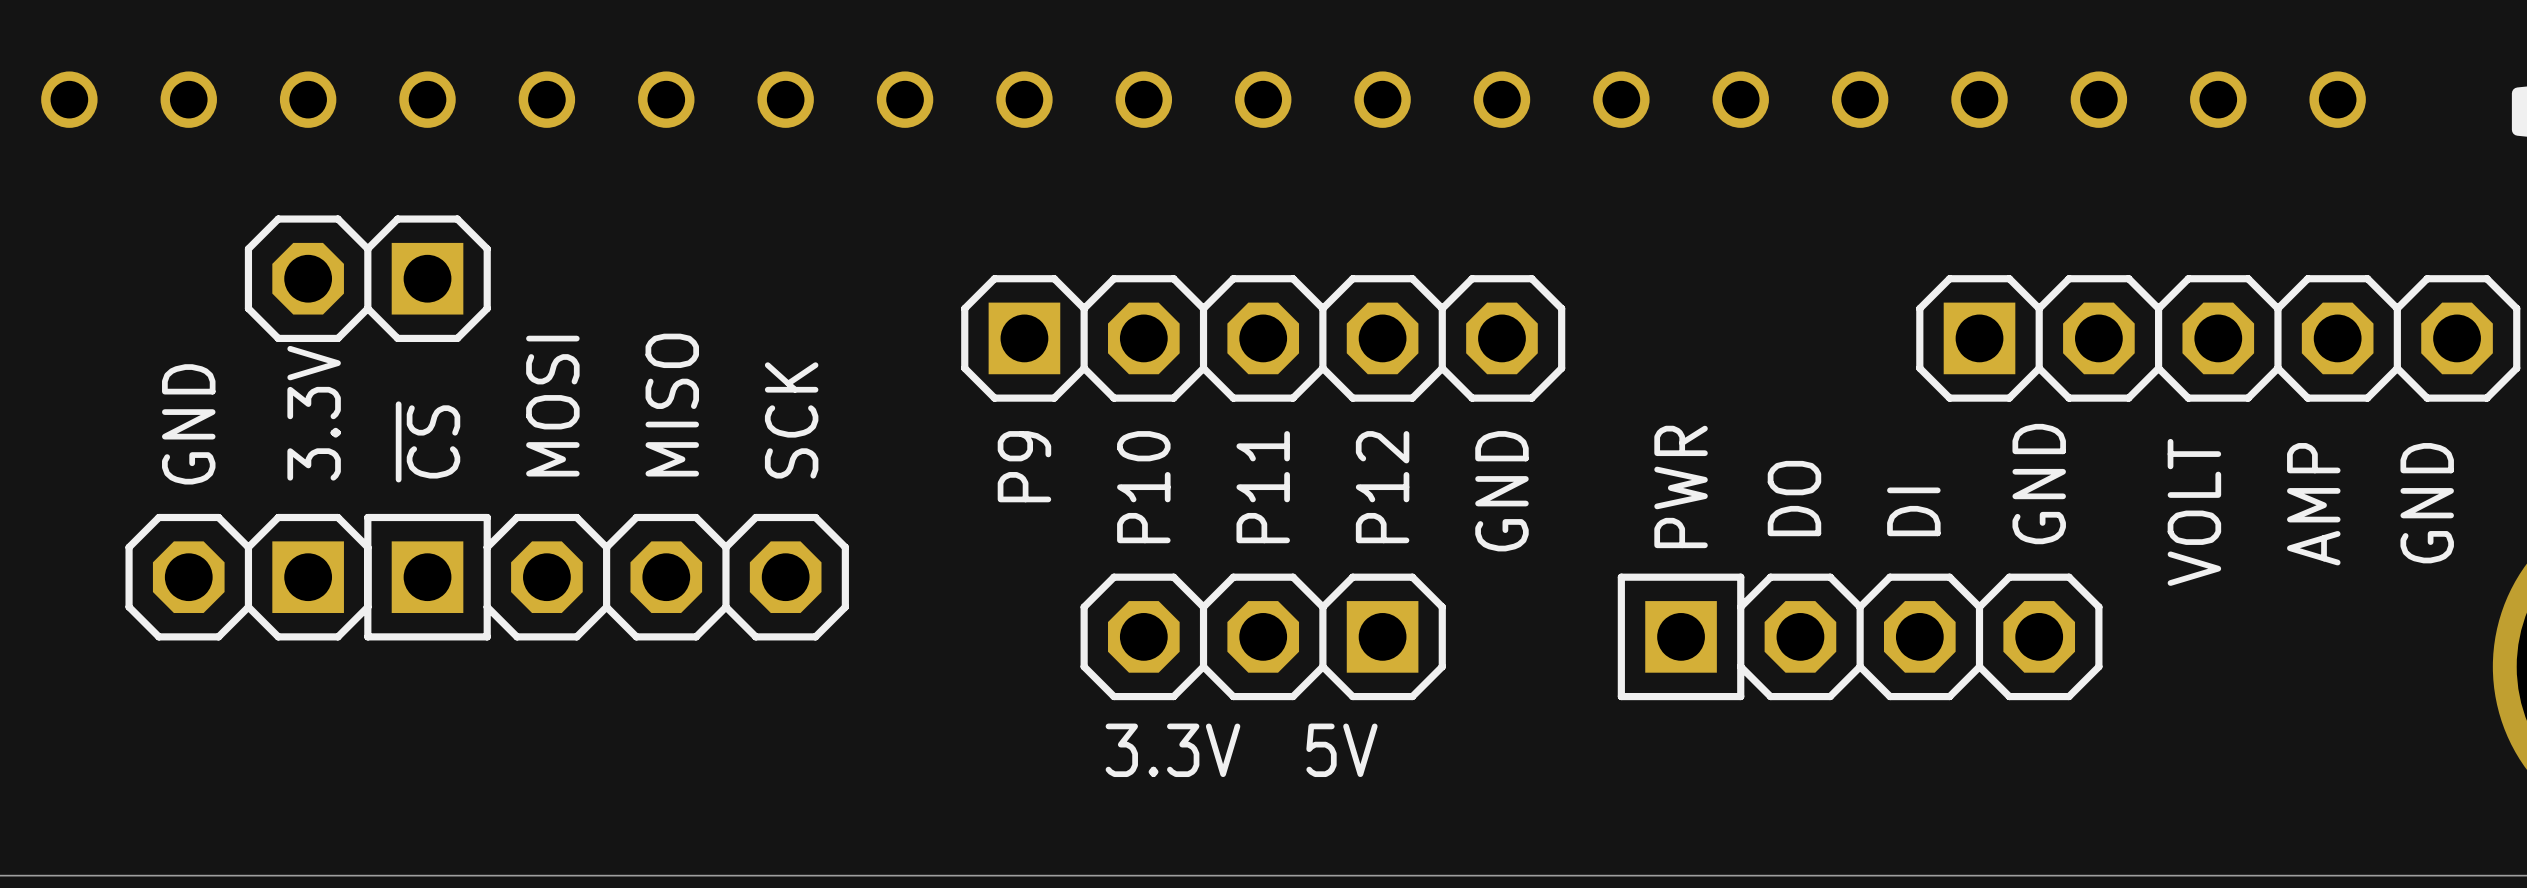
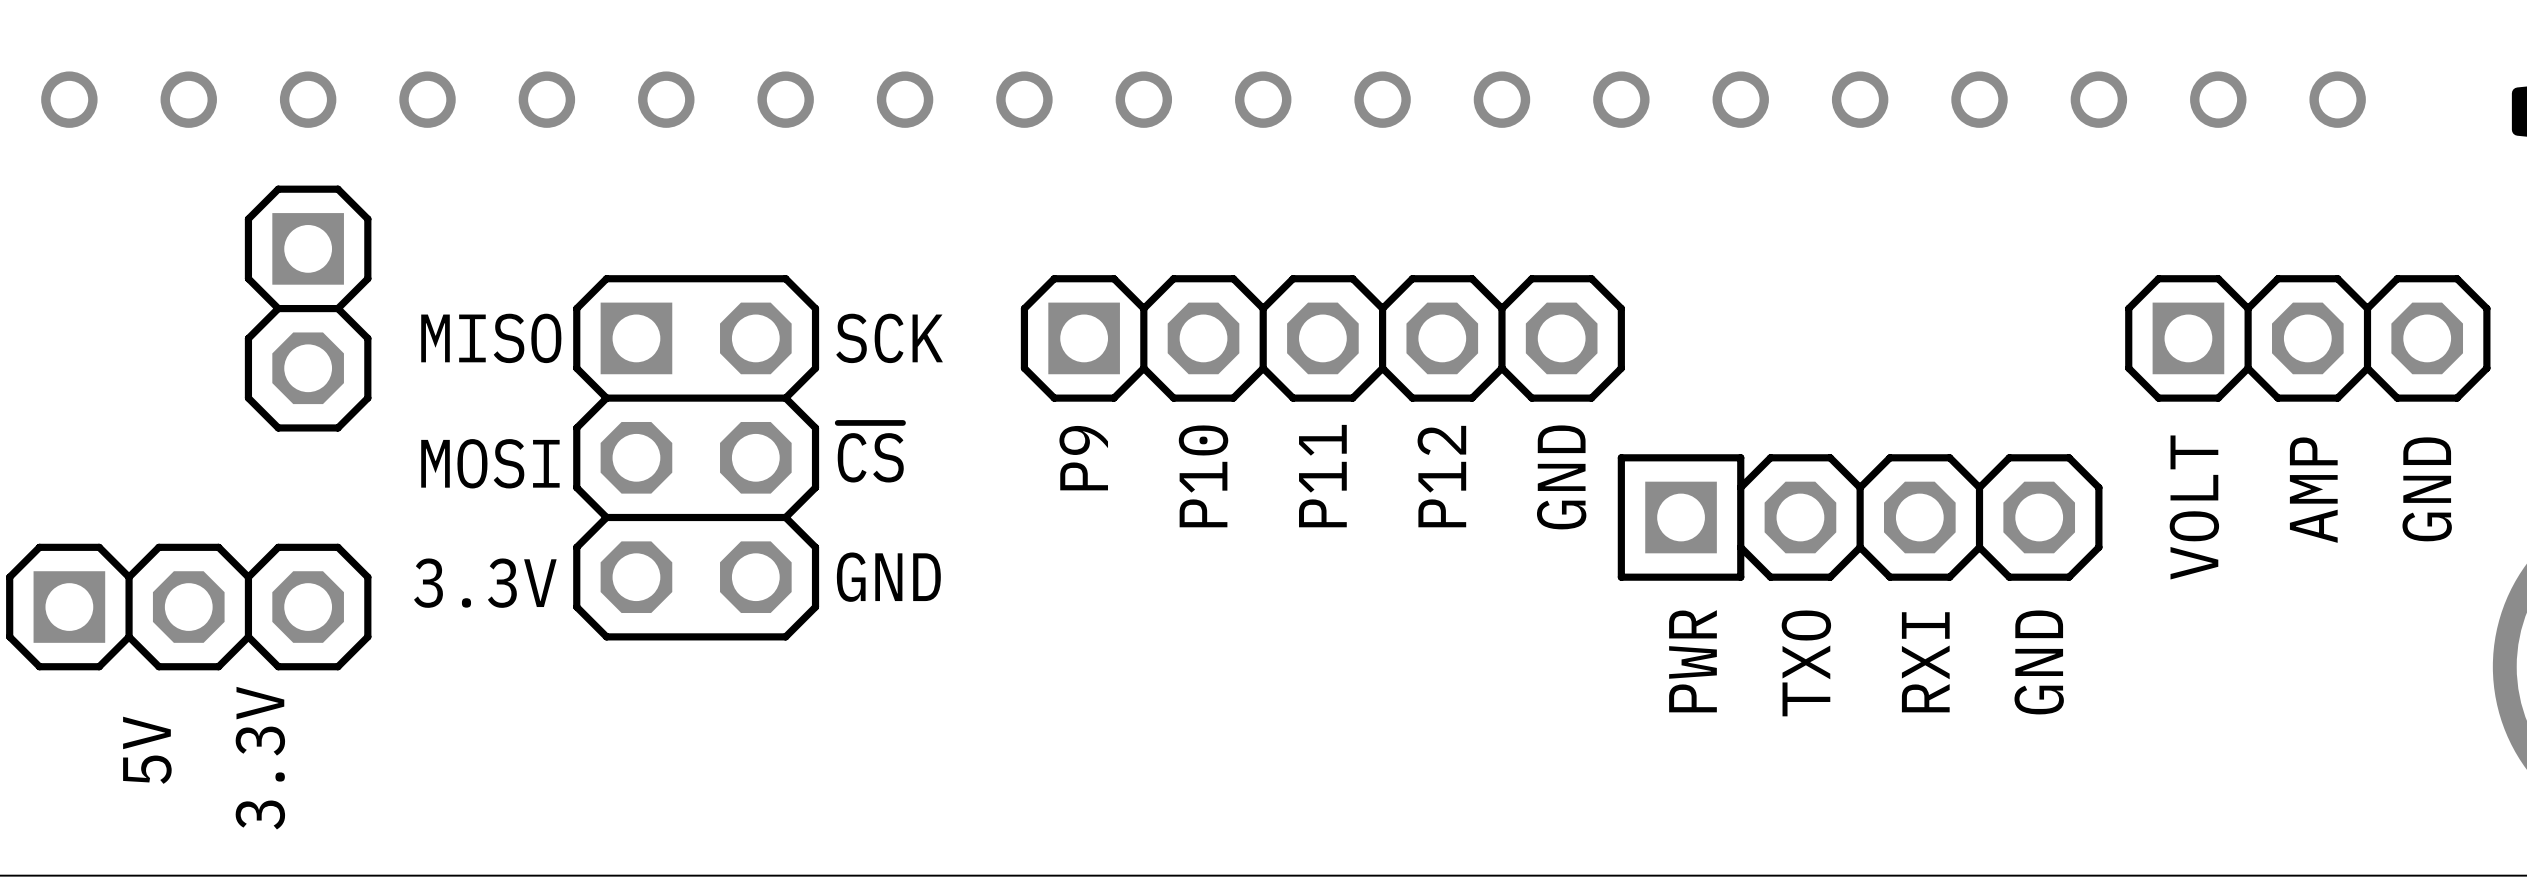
part rotation: 0° (367, 278) -> 90° counterclockwise (308, 308)
part position: (1263, 338) -> (1322, 338)
part: (2218, 338) -> none
part: none -> (2307, 338)
text rotation: 0° (672, 405) -> 90° clockwise (491, 338)
text position: MISO (672, 405) -> MISO (491, 338)
text rotation: 0° (552, 406) -> 90° clockwise (490, 463)
text: 3.3V (314, 413) -> none
text rotation: 0° (791, 420) -> 90° clockwise (889, 338)
text: GND (188, 424) -> none
text rotation: 0° (428, 441) -> 90° clockwise (870, 452)
text position: ~{CS} (428, 441) -> ~{CS} (870, 452)
part: none -> (696, 457)
text position: P9 (1024, 466) -> P9 (1083, 458)
text position: GND (2039, 484) -> GND (2039, 662)
text position: PWR (1681, 486) -> PWR (1692, 661)
text position: P10 (1143, 487) -> P10 (1203, 476)
text position: P11 (1263, 487) -> P11 (1322, 476)
text position: P12 (1382, 487) -> P12 (1441, 476)
text position: GND (1501, 491) -> GND (1561, 477)
text: DO (1794, 498) -> none
text: DI (1913, 511) -> none
part: (248, 577) -> none
part: (606, 577) -> none
text: none -> GND (888, 577)
text: none -> 3.3V (485, 583)
part: none -> (188, 607)
part: (1263, 636) -> none
part position: (1860, 636) -> (1860, 517)
text: none -> RXI (1925, 662)
text: none -> TXO (1806, 663)
text: 3.3V (1172, 750) -> none
text: 5V (1341, 750) -> none
text: none -> 5V (147, 750)
text: none -> 3.3V (260, 758)

